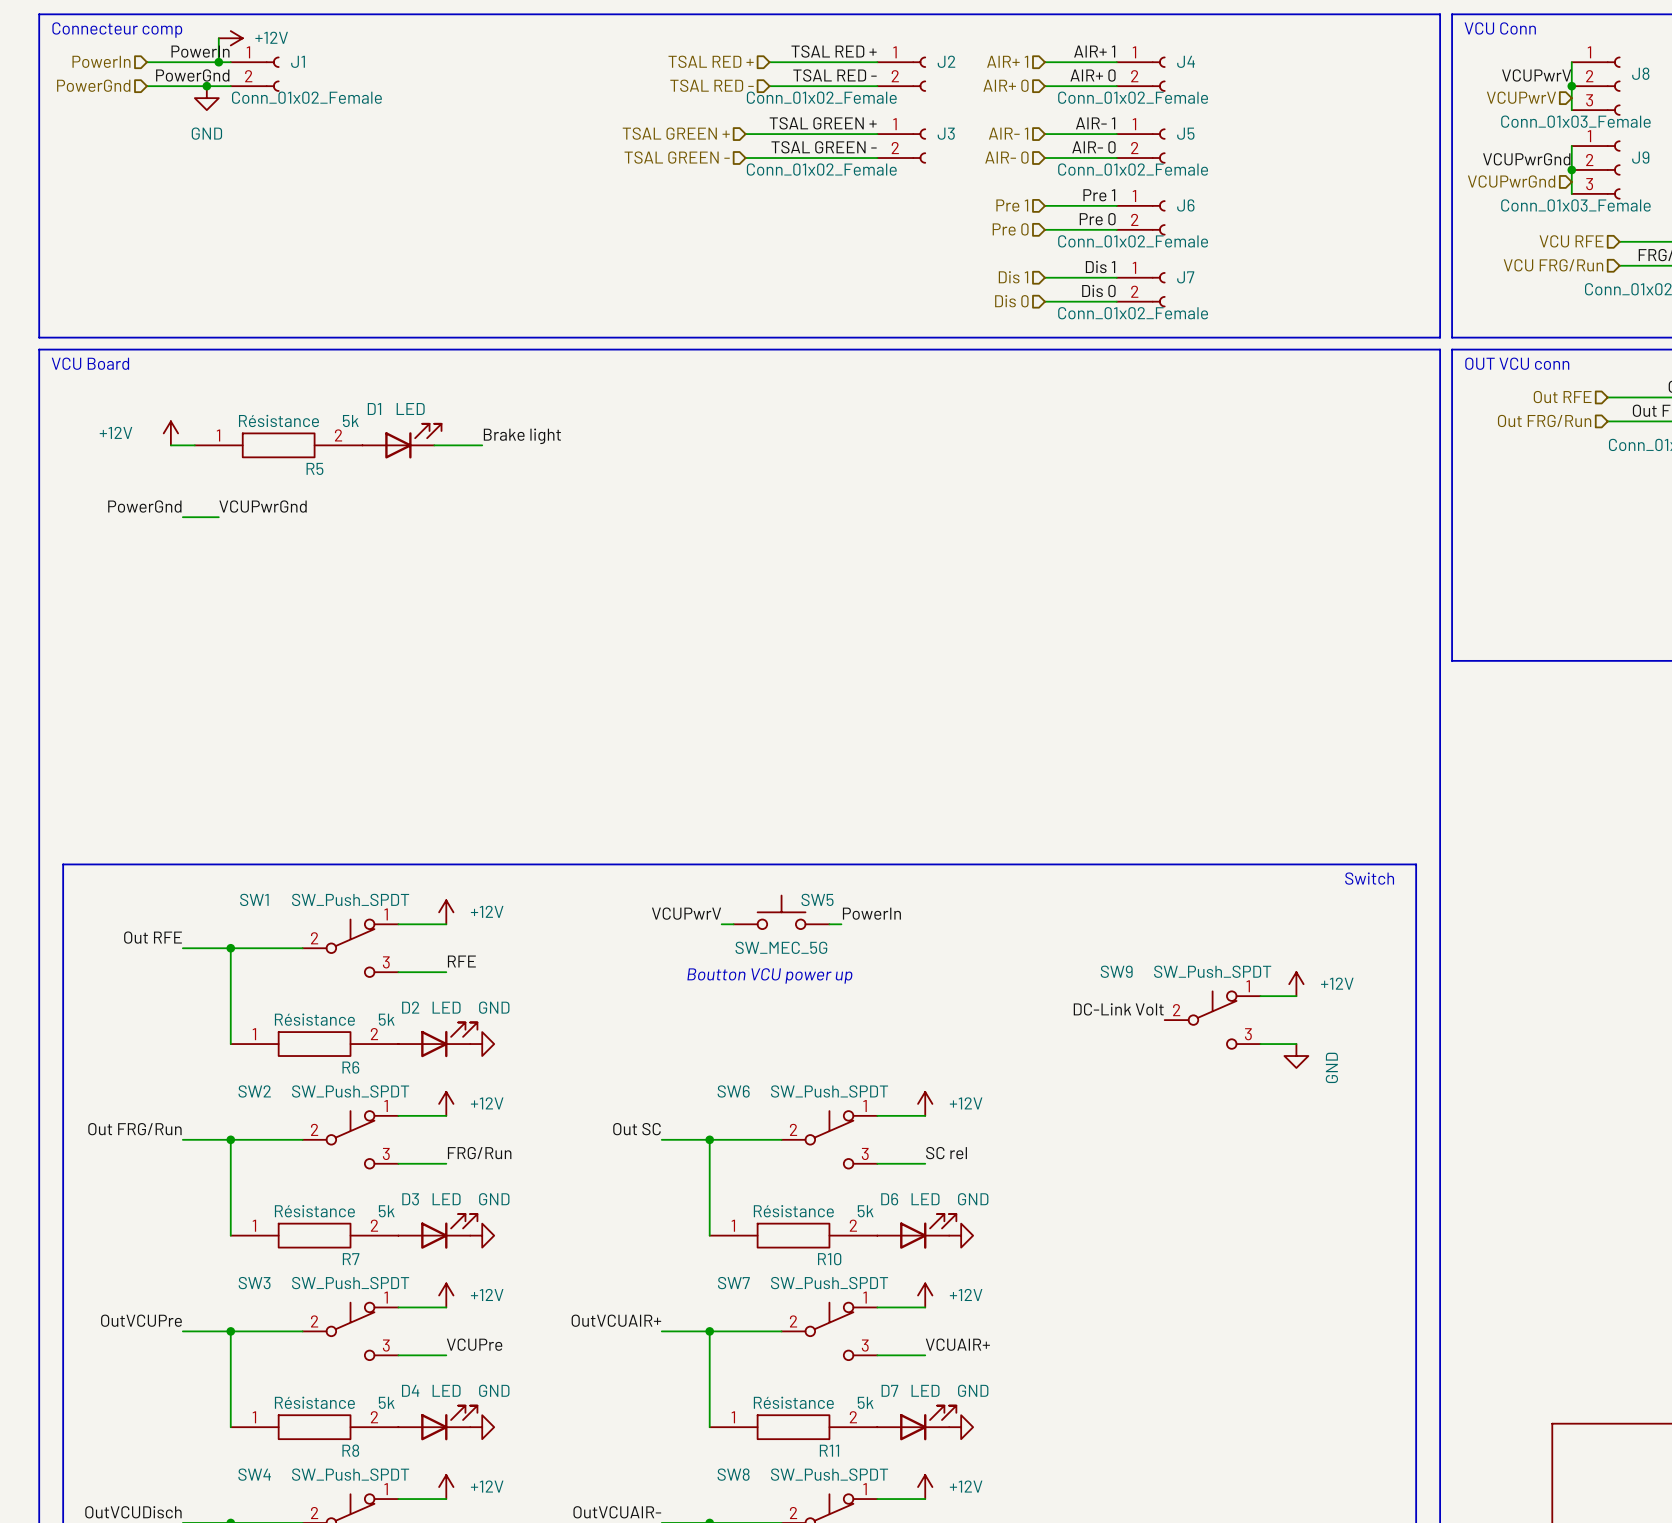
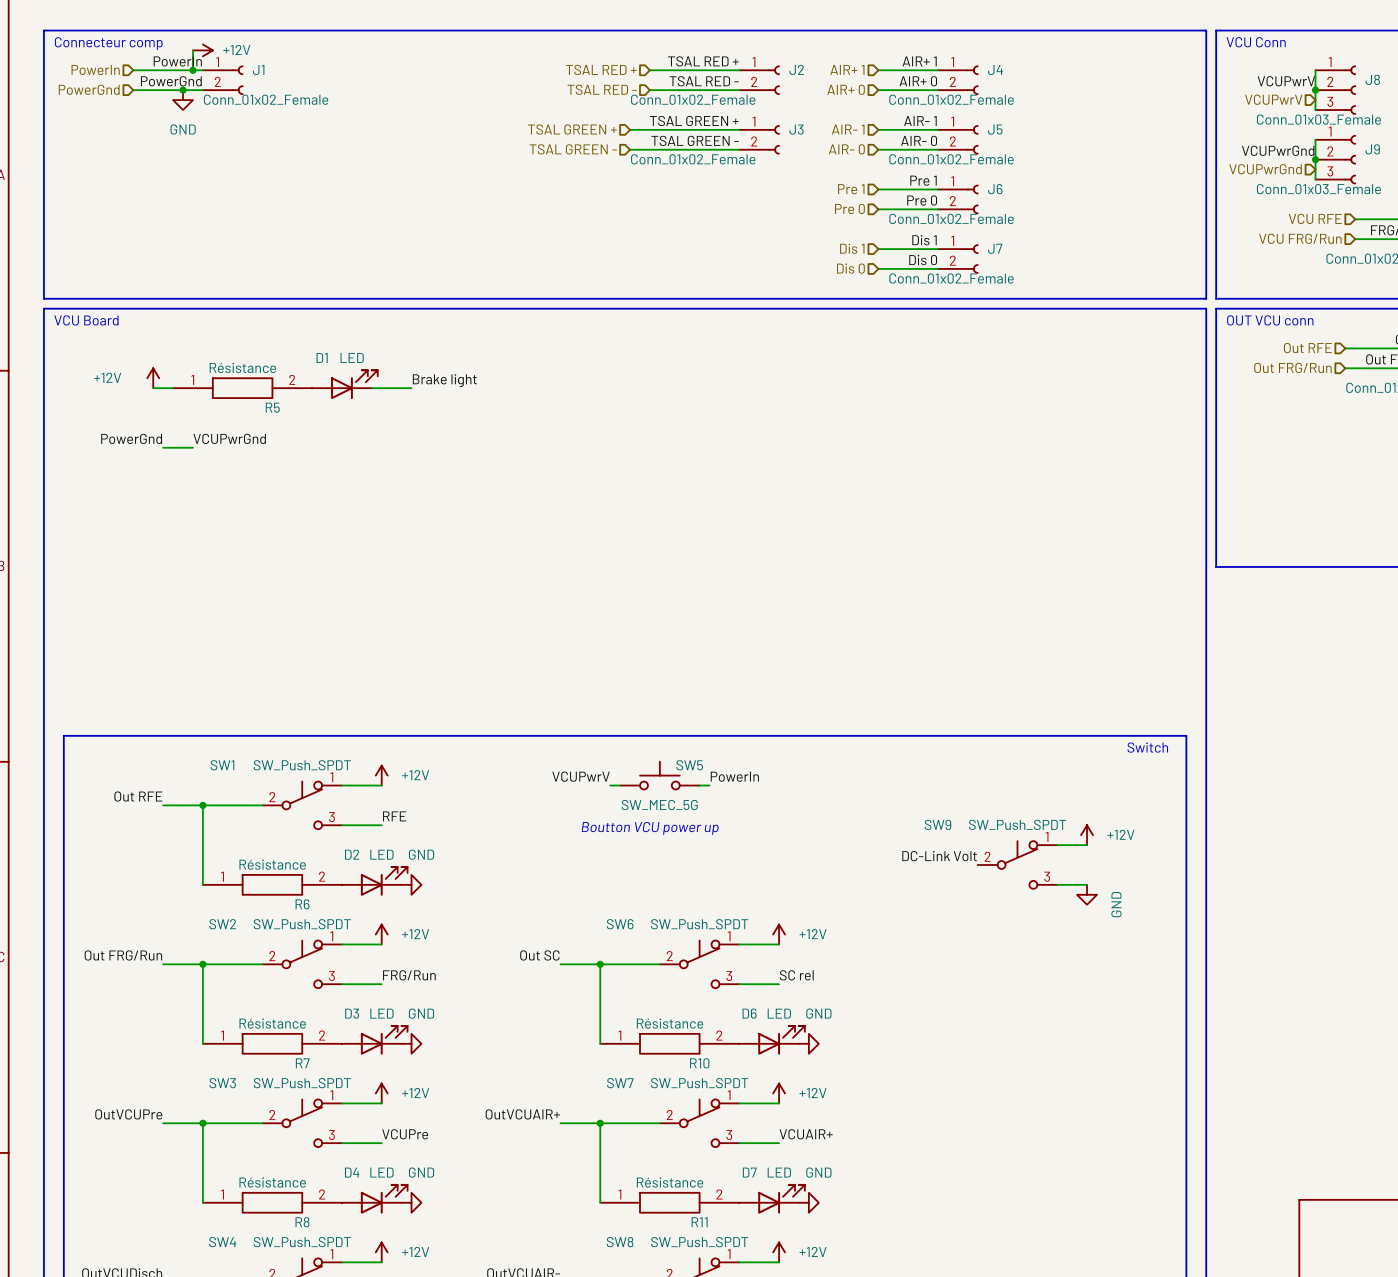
R5 text: 5k (350, 421) -> none
R6 text: 5k (386, 1019) -> none
R7 text: 5k (386, 1211) -> none
R10 text: 5k (865, 1211) -> none
R8 text: 5k (386, 1402) -> none
R11 text: 5k (865, 1402) -> none

